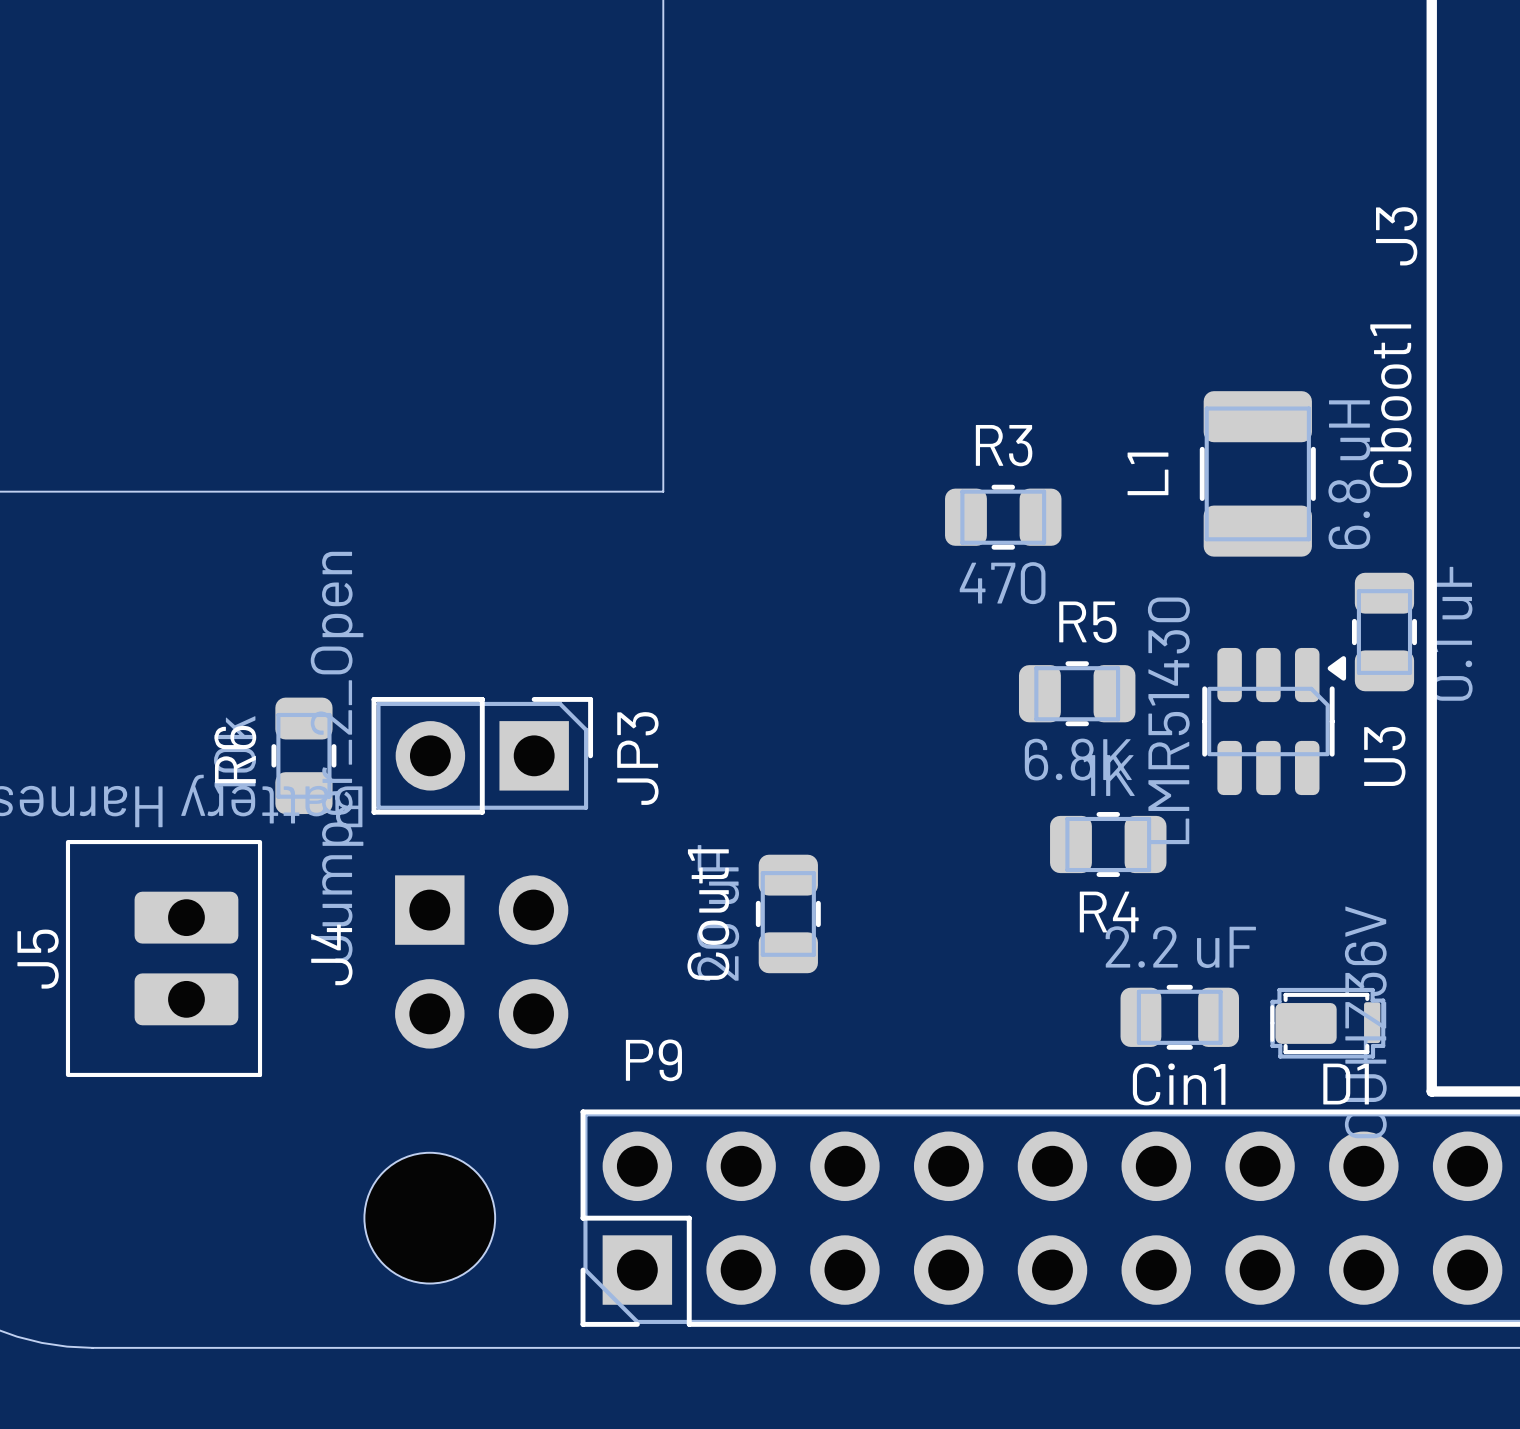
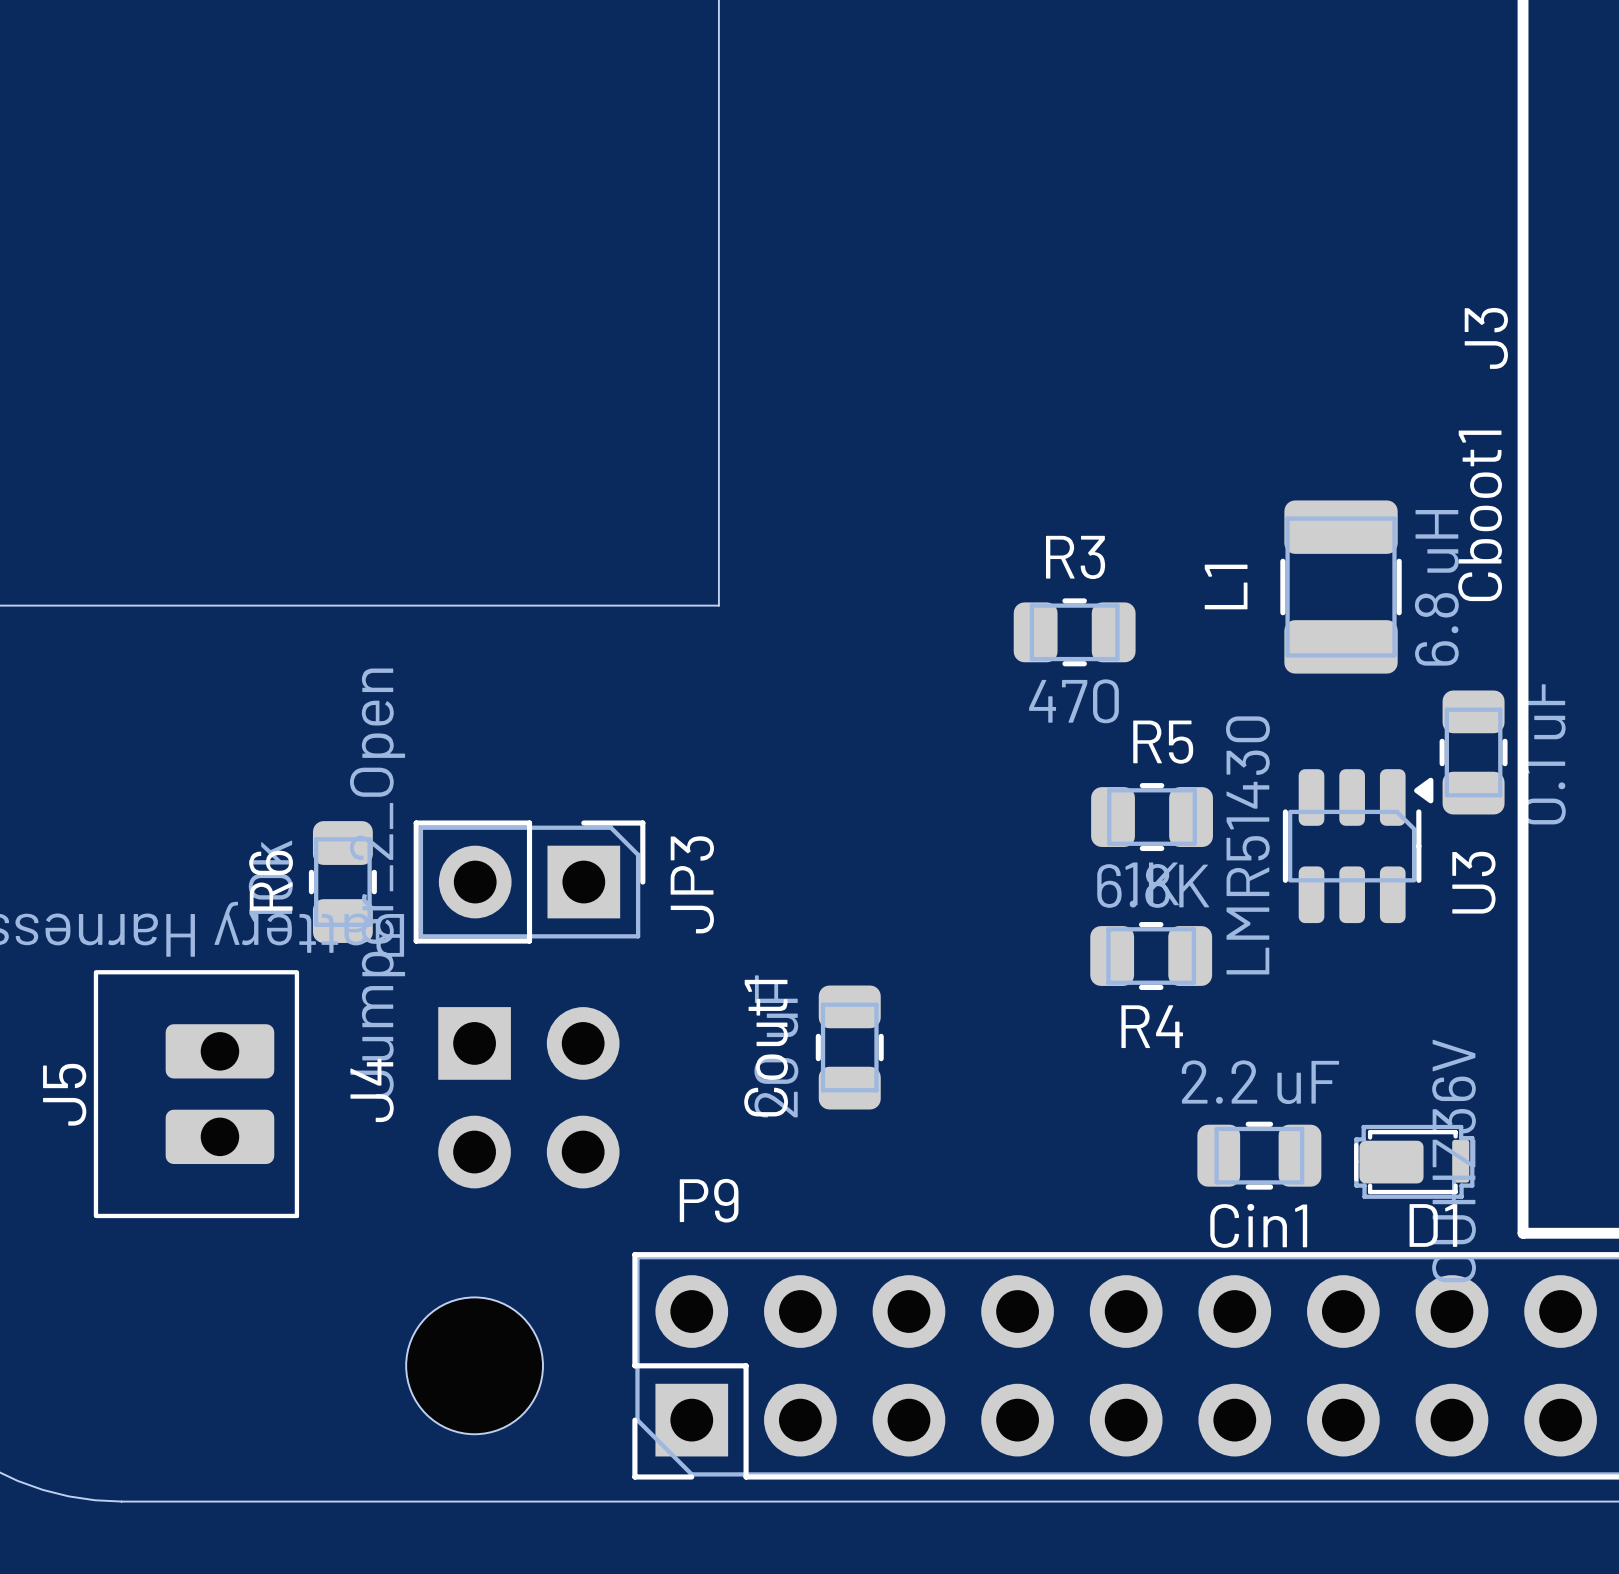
R4 position: (1108, 844) -> (1151, 956)

